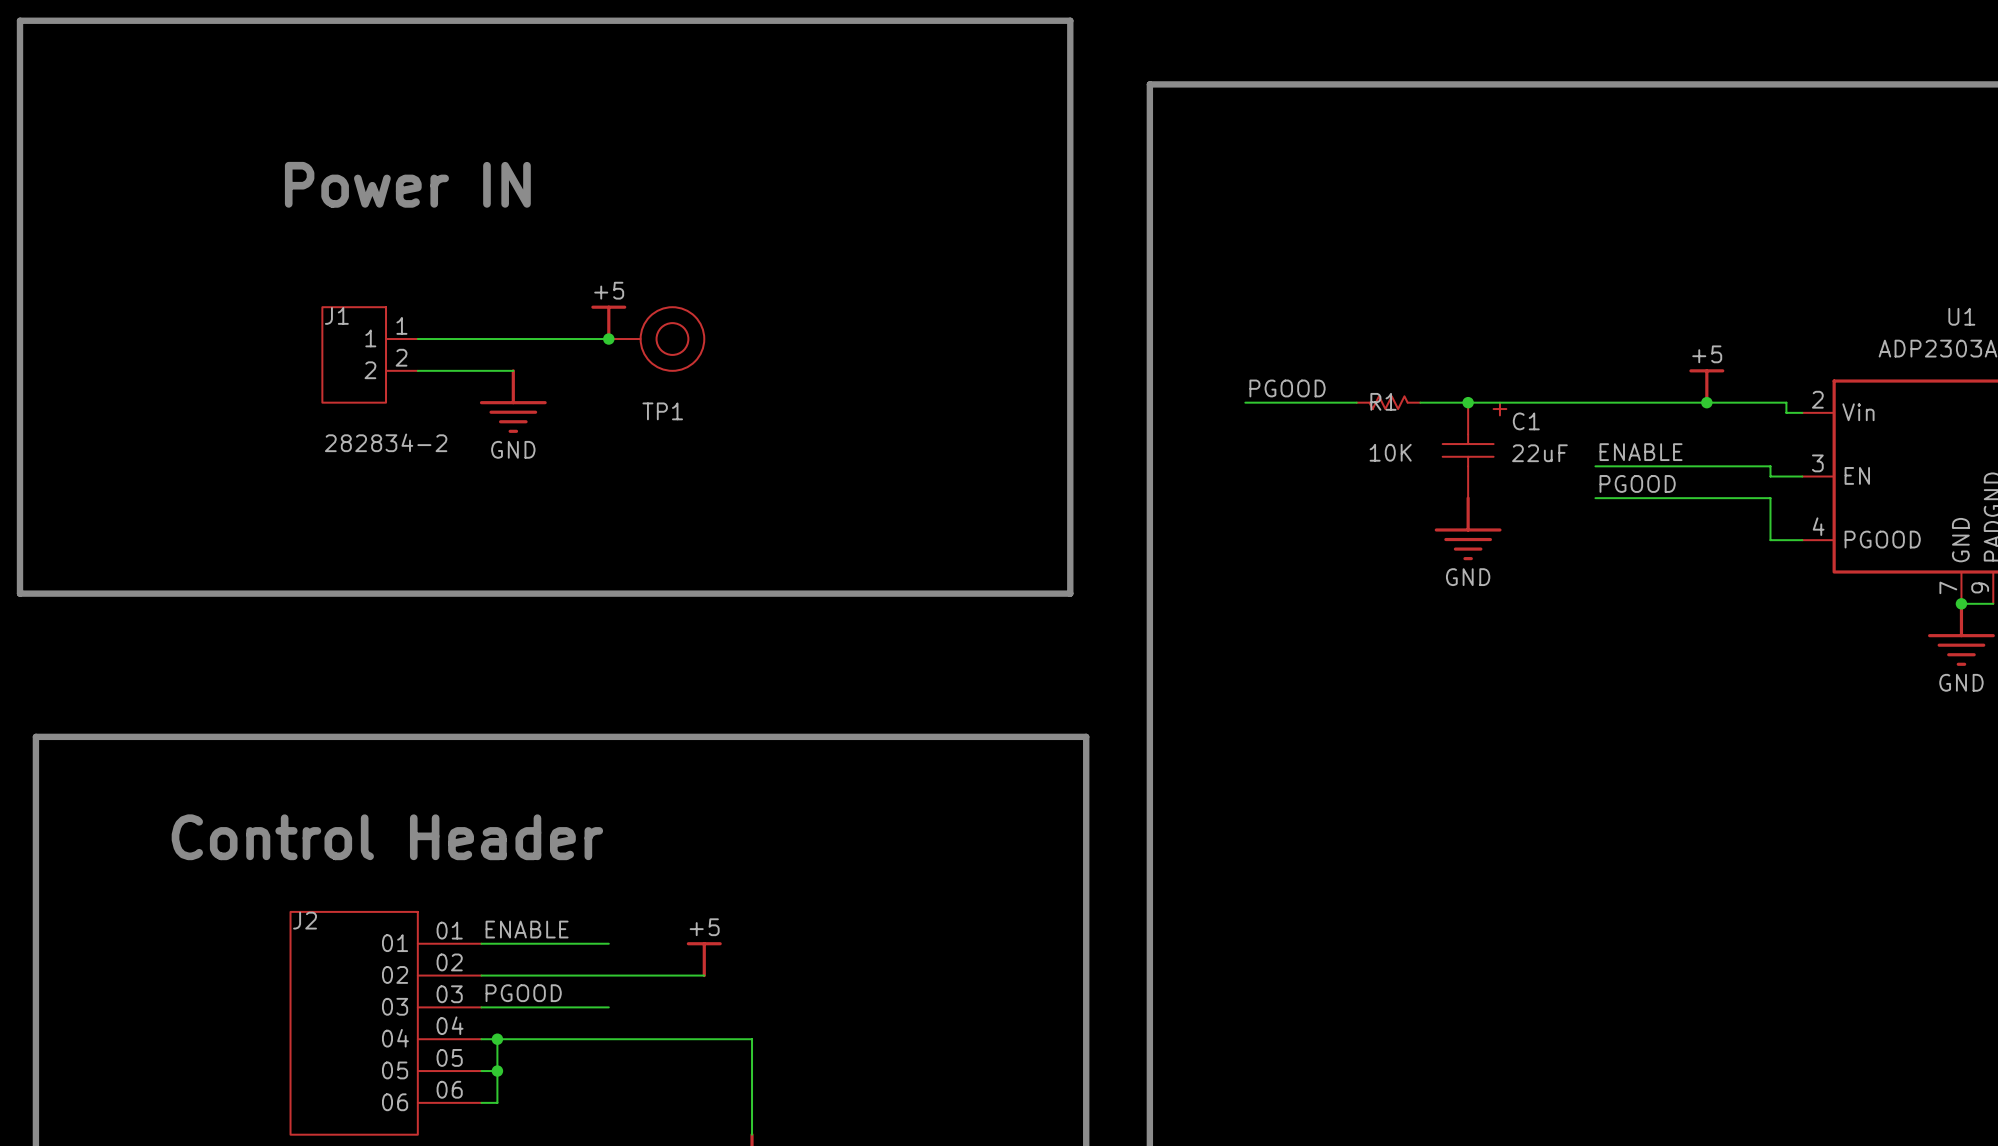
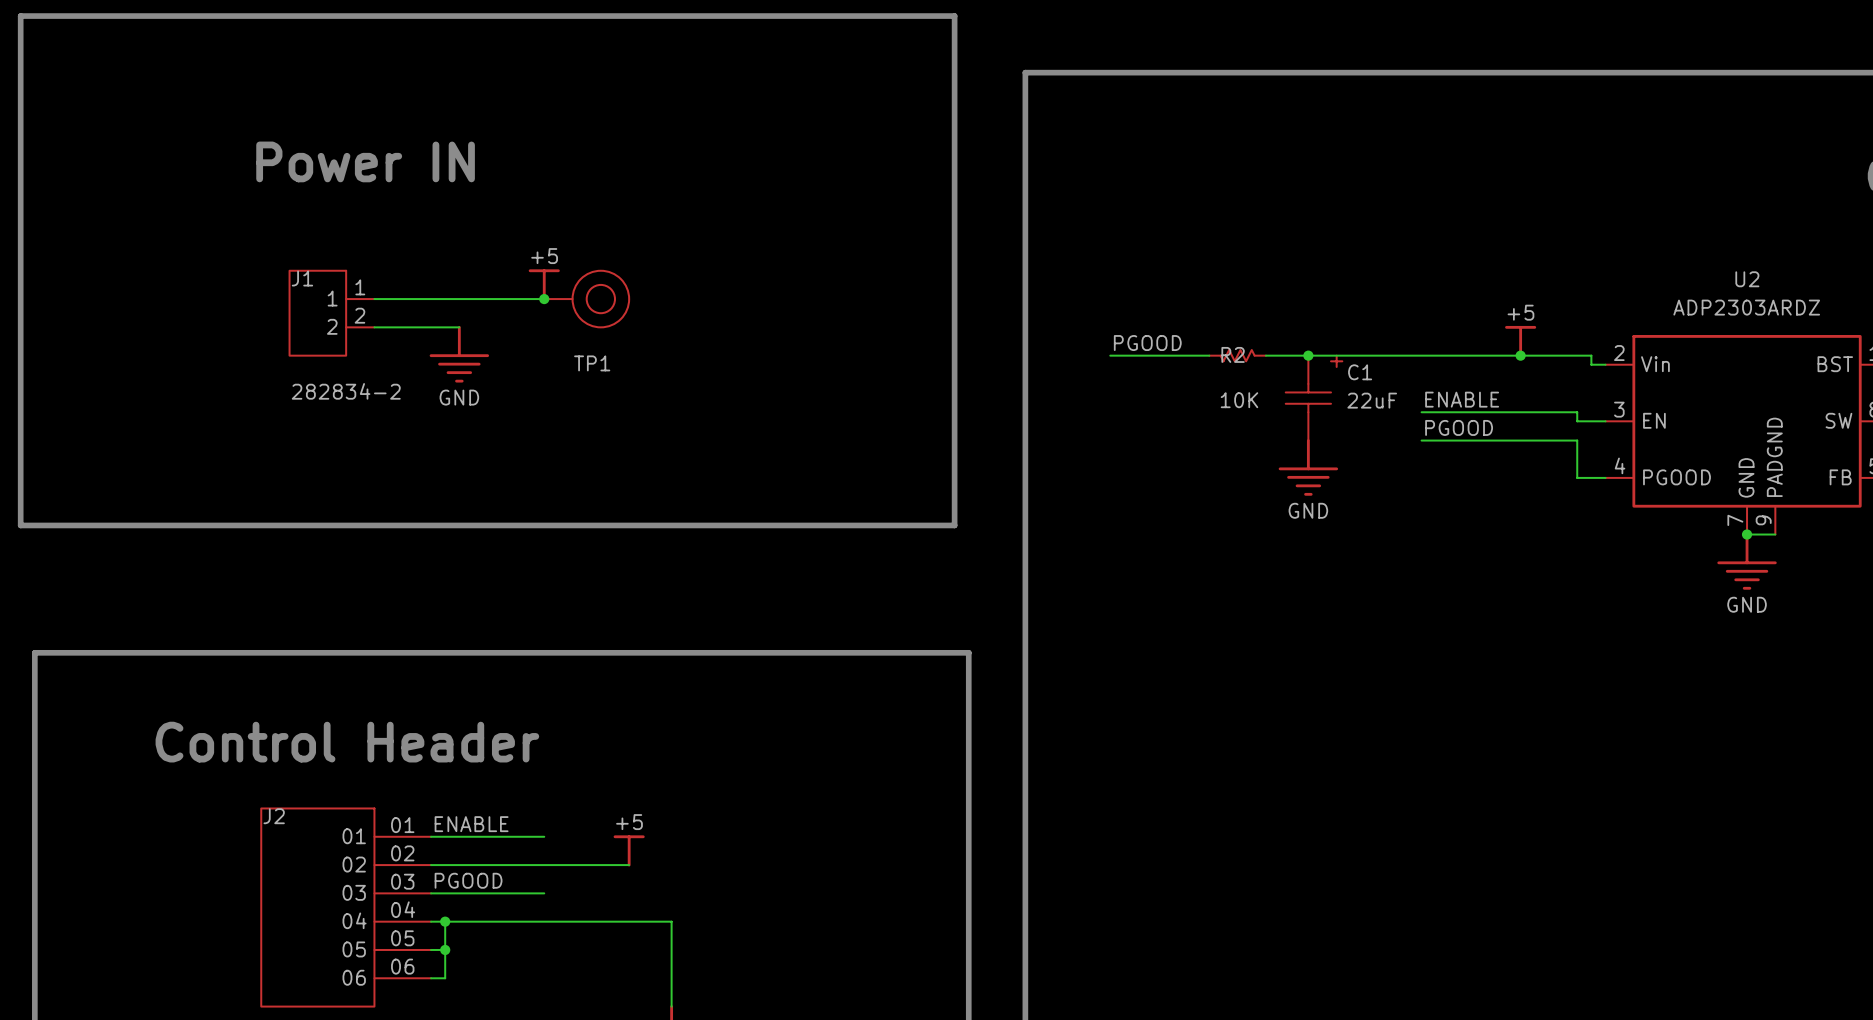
U1 name: U1 (1961, 316) -> U2 (1747, 279)
R1 name: R1 (1383, 401) -> R2 (1233, 354)

